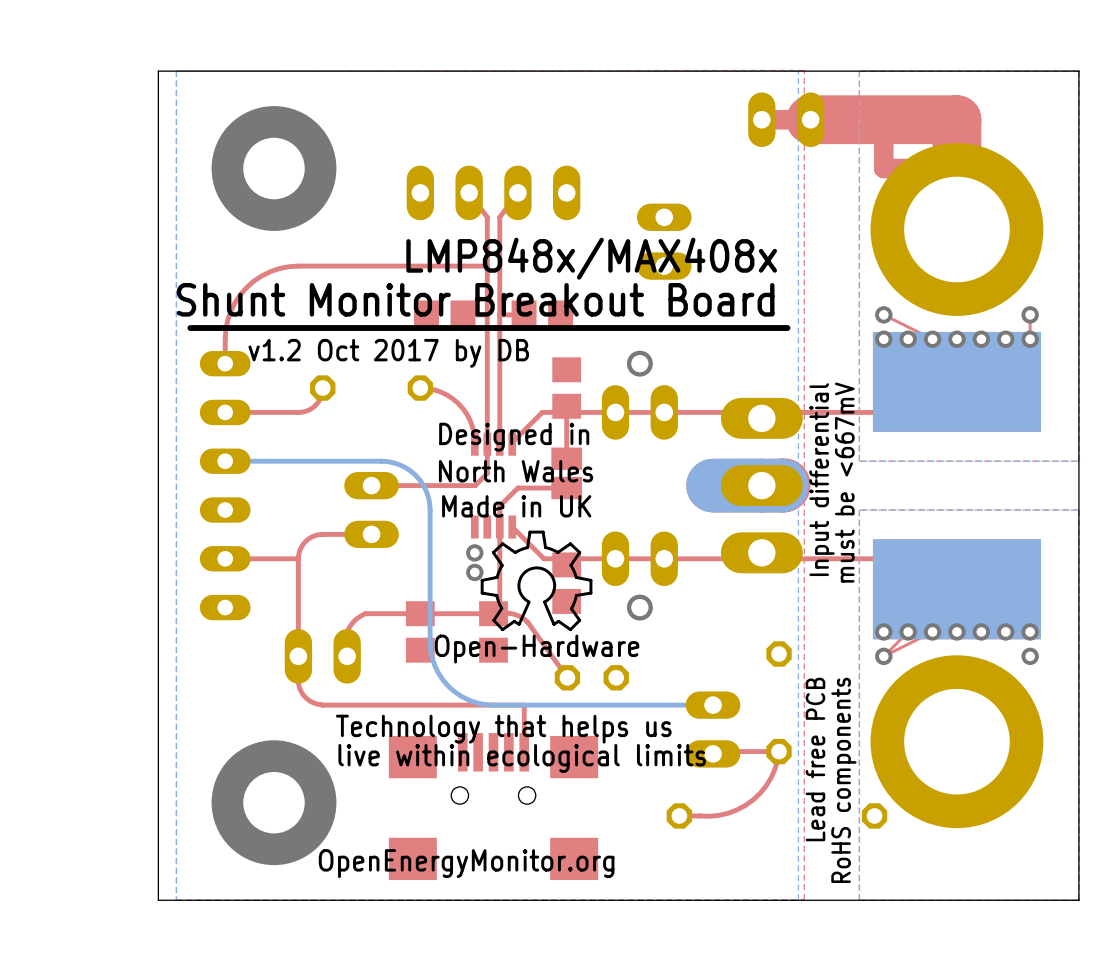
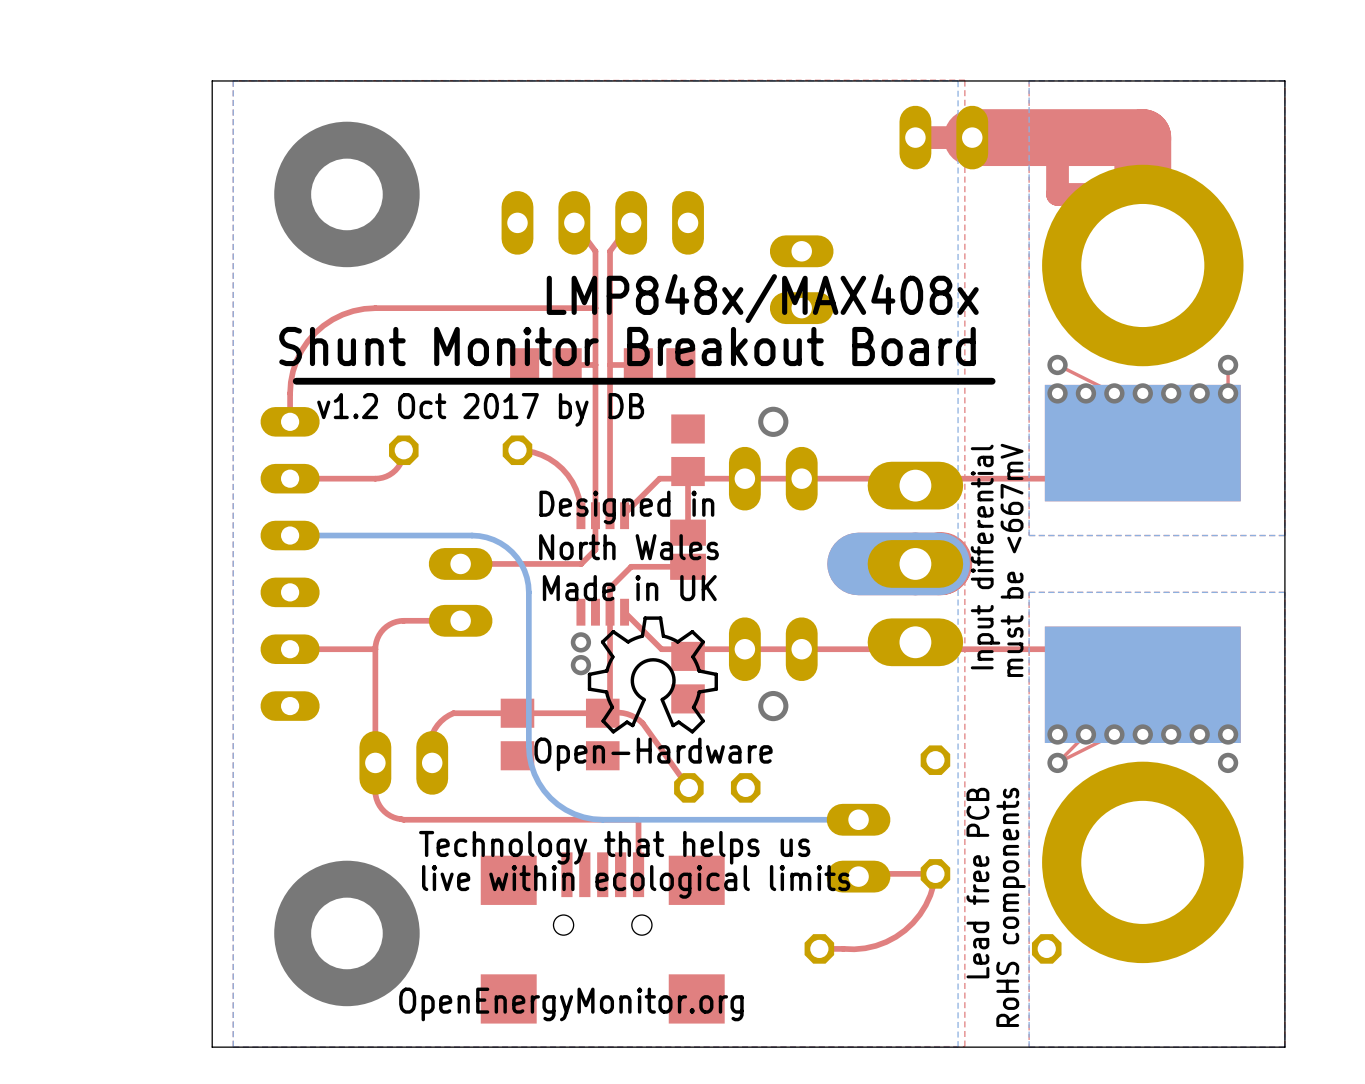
text position: LMP848x/MAX408x (591, 258) -> LMP848x/MAX408x (762, 298)
text position: Shunt Monitor Breakout Board (475, 299) -> Shunt Monitor Breakout Board (627, 346)
line: (787, 328) (190, 328) -> (992, 381) (296, 381)

